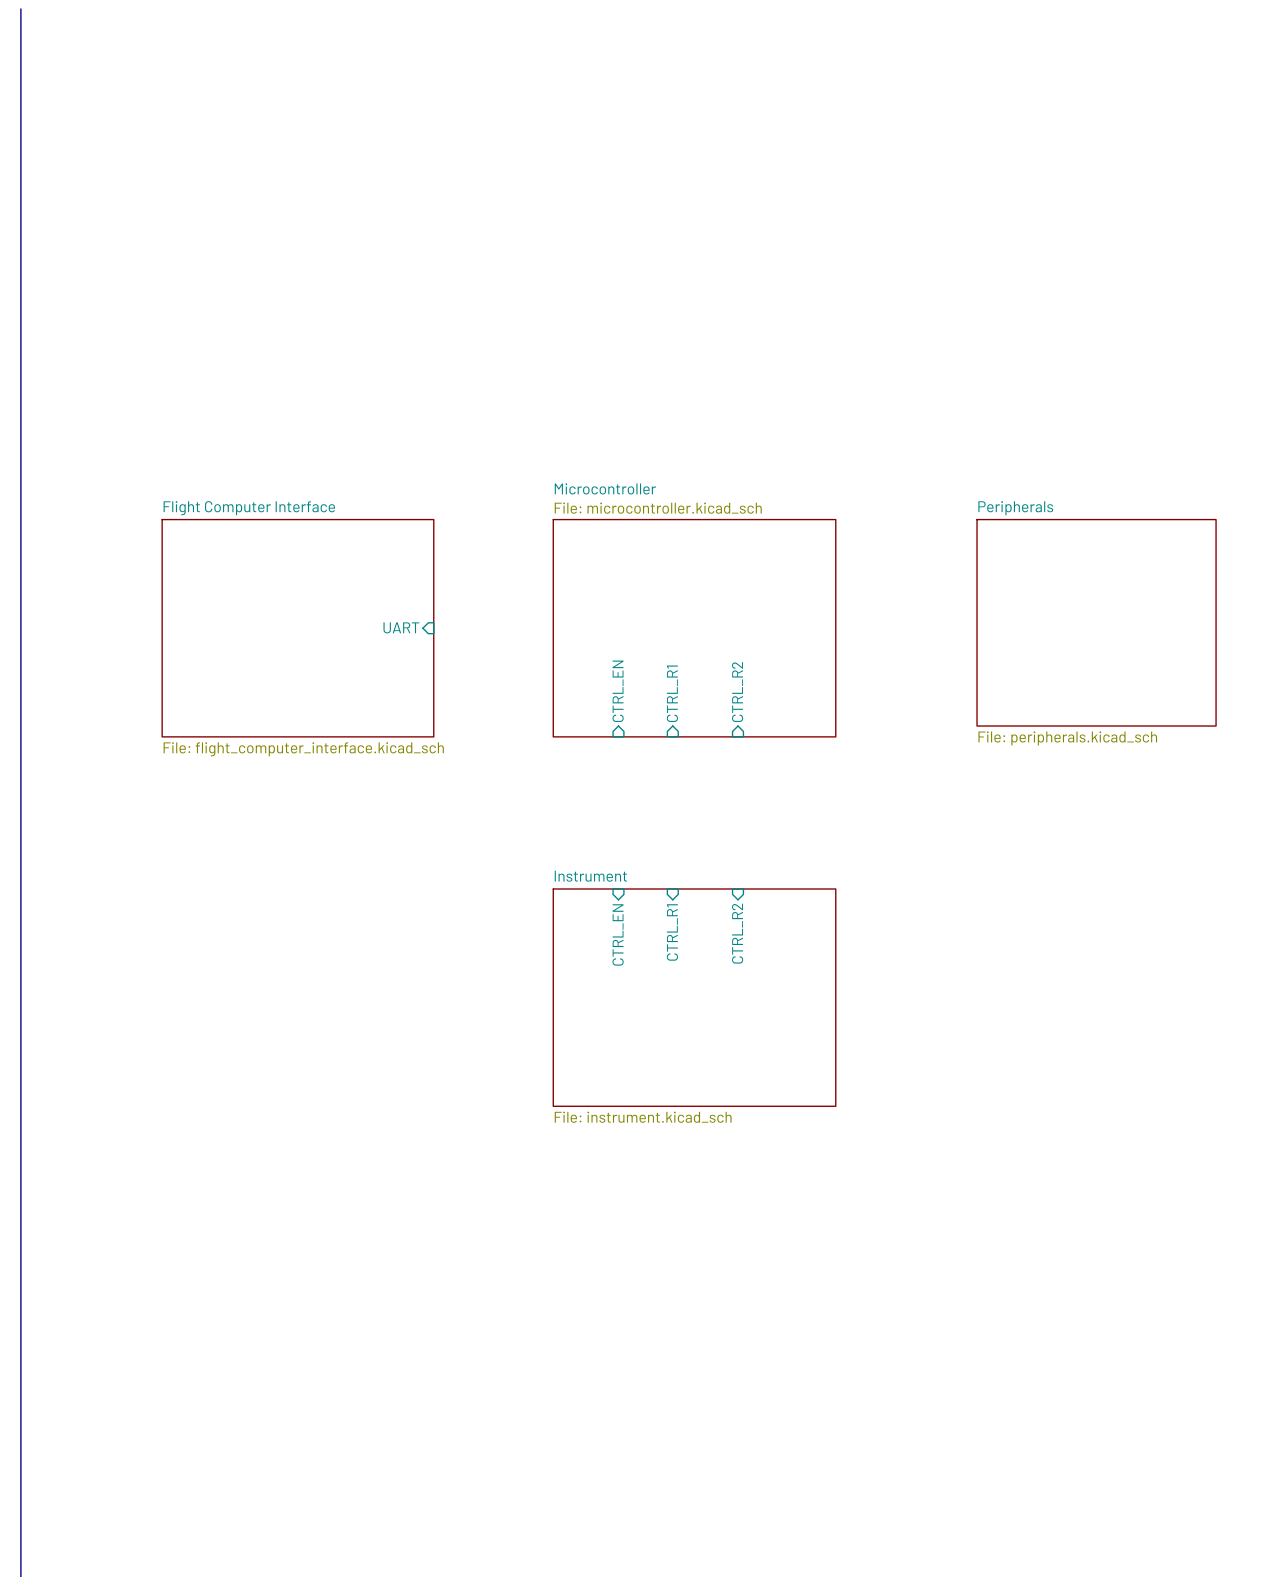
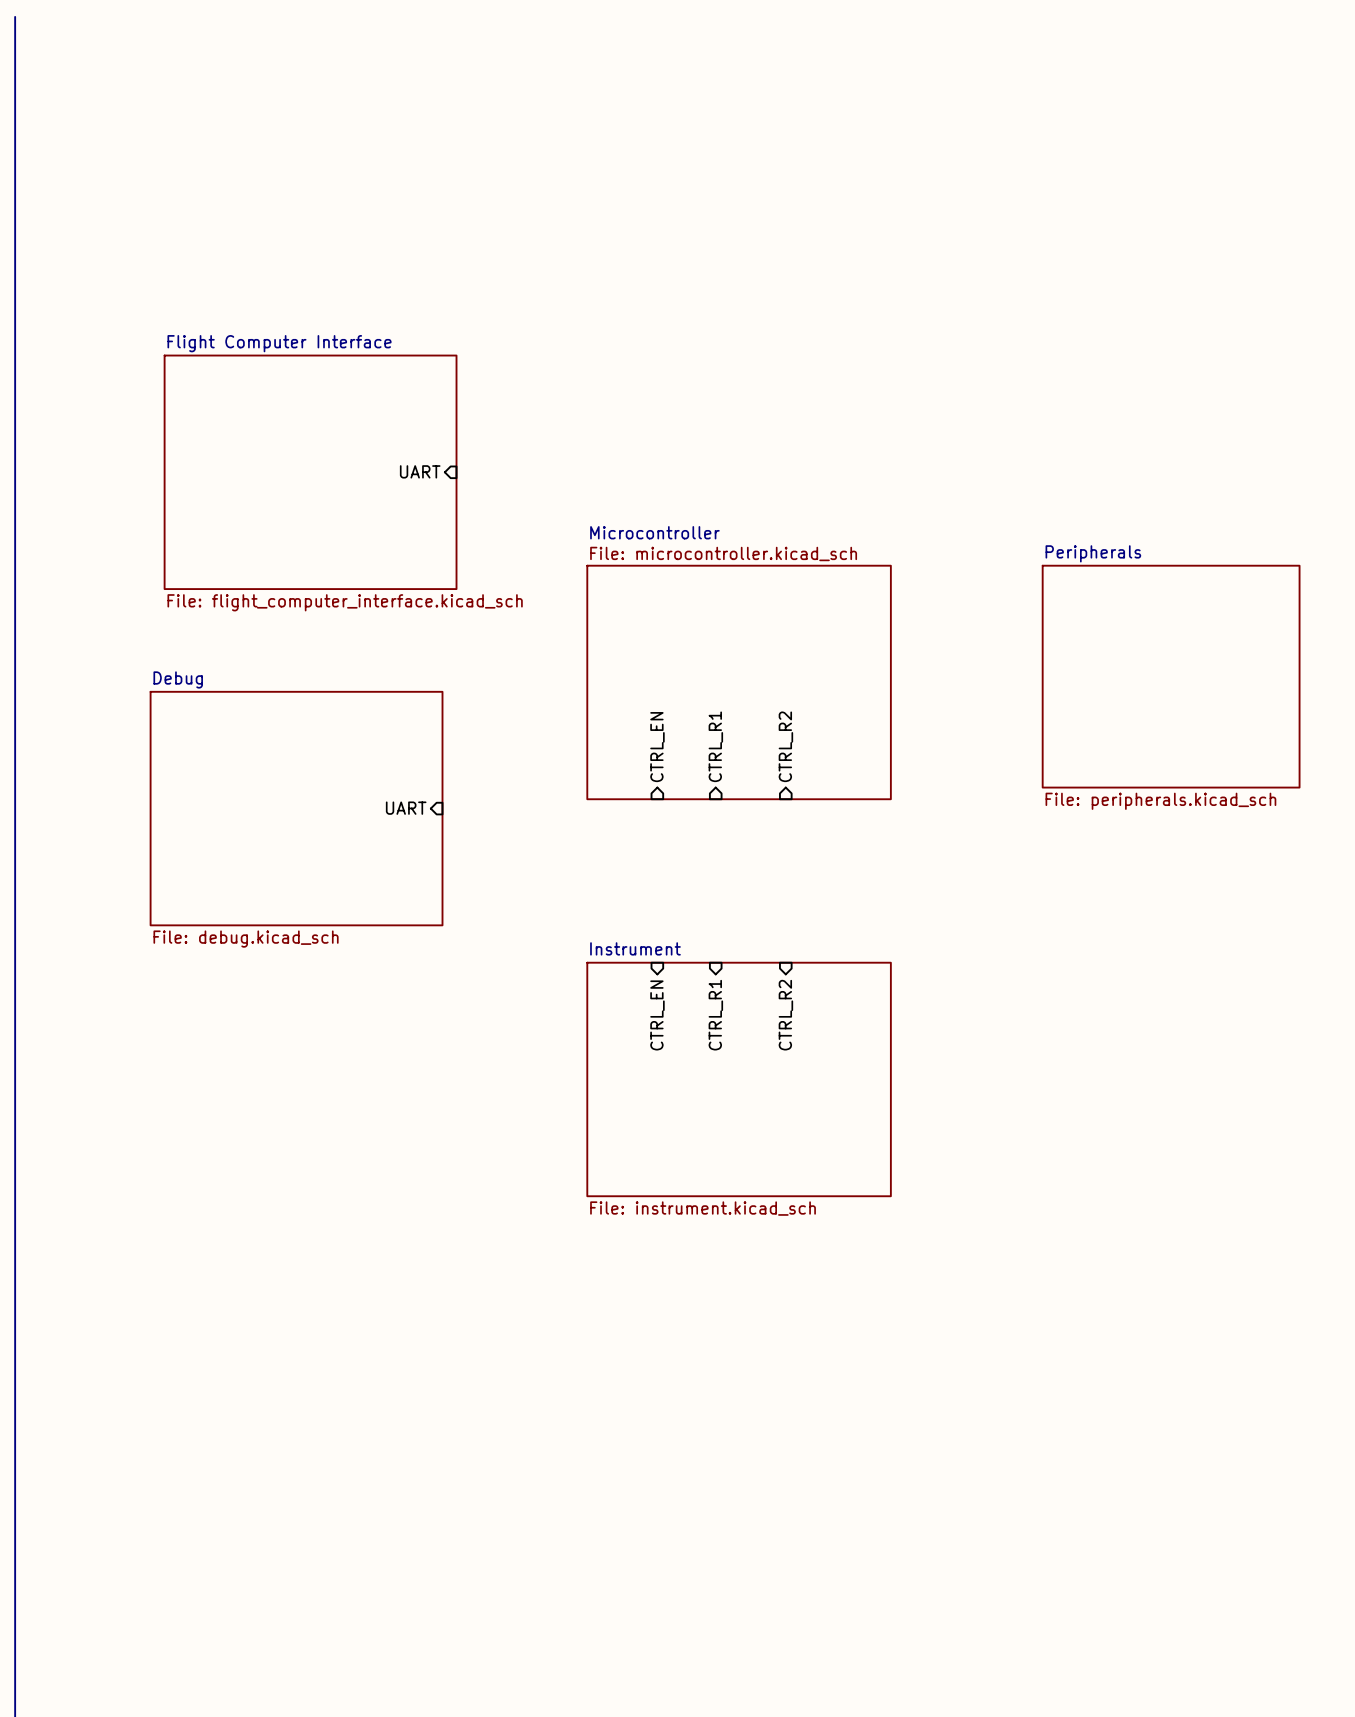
sheet pin: none -> UART (420, 471)
sheet pin: UART (401, 627) -> none
sheet Flight Computer Interface position: (297, 628) -> (310, 472)
sheet Debug: none -> File: debug.kicad_sch (296, 808)
sheet pin: none -> UART (406, 808)

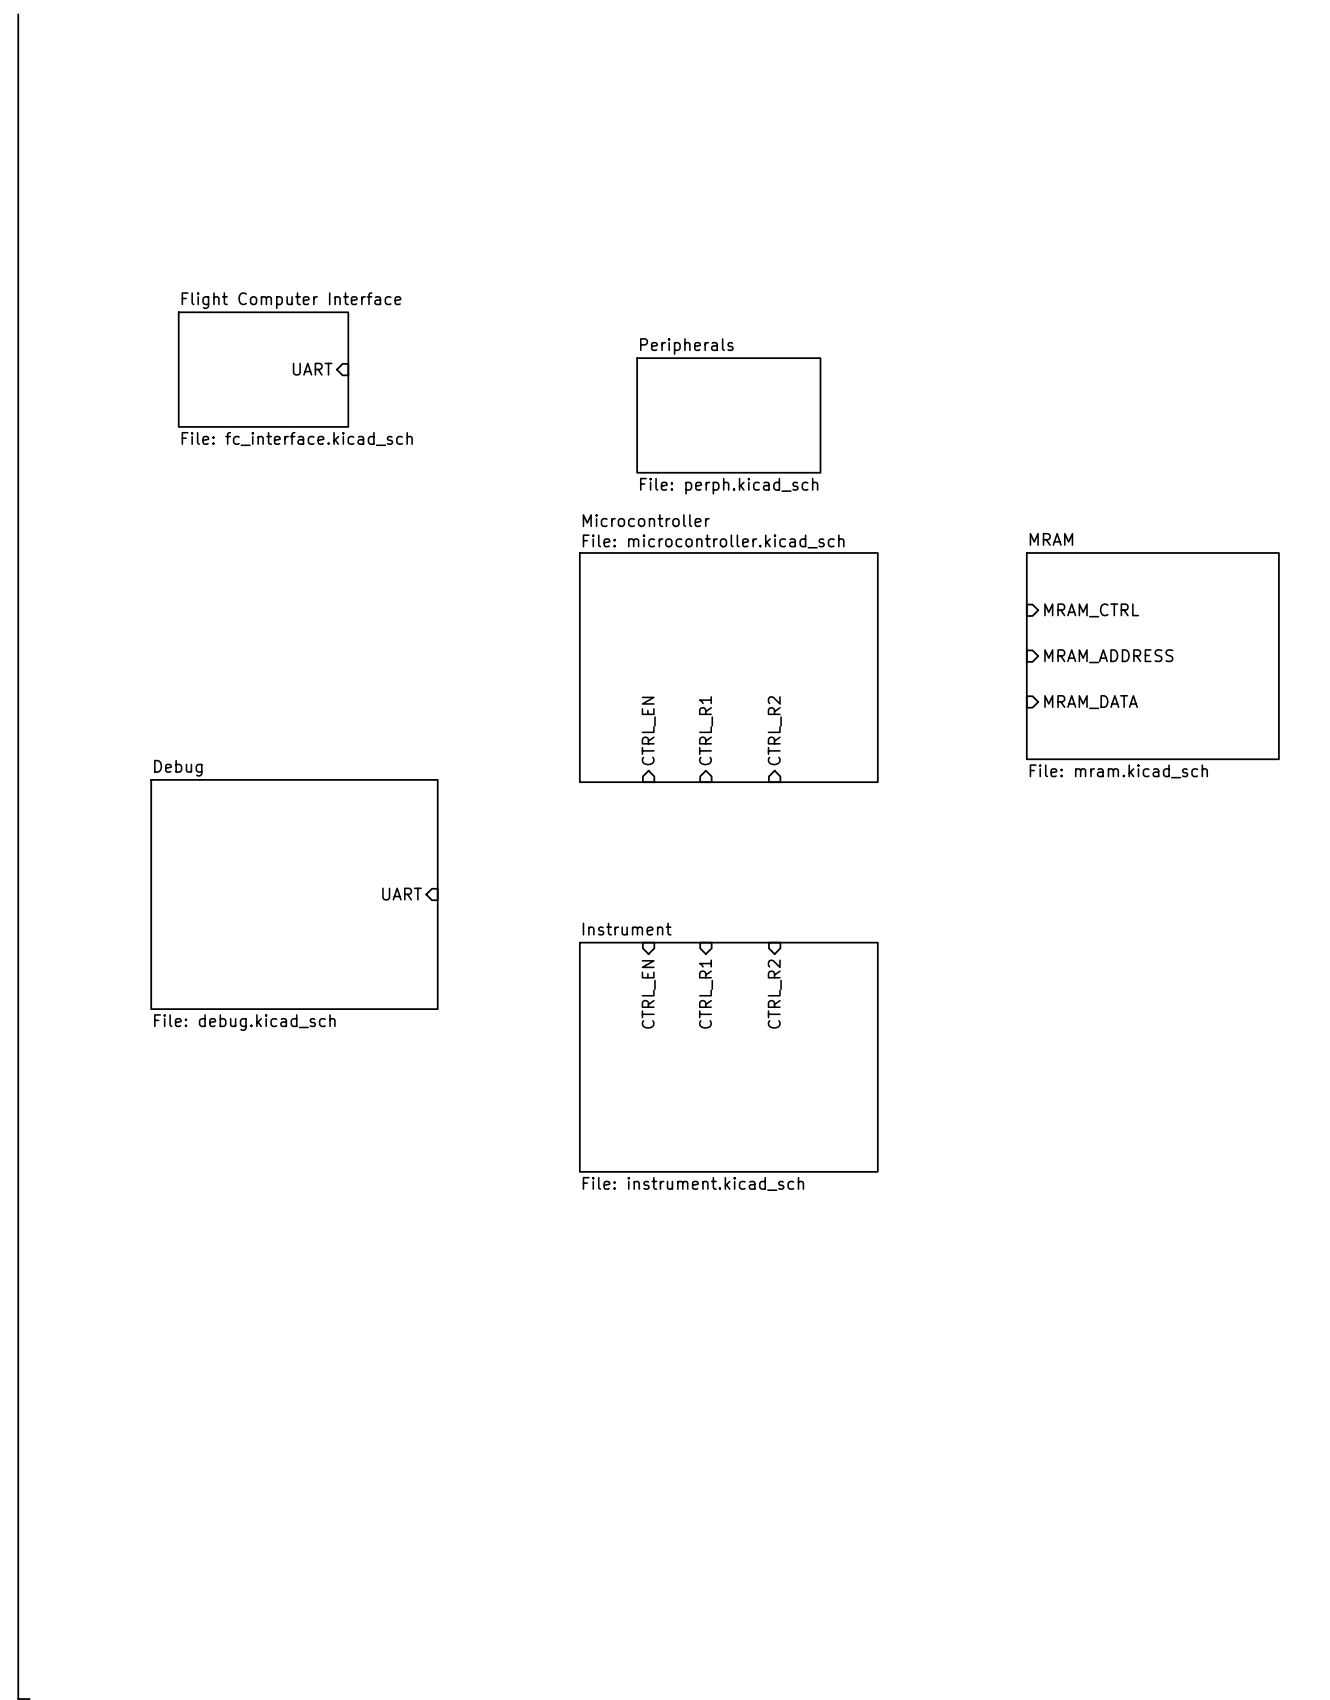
sheet Flight Computer Interface: none -> File: fc_interface.kicad_sch (263, 369)
sheet Peripherals: none -> File: perph.kicad_sch (728, 415)
sheet pin position: UART (420, 471) -> UART (312, 369)
sheet Flight Computer Interface: File: flight_computer_interface.kicad_sch (310, 472) -> none
sheet pin: none -> MRAM_CTRL (1091, 610)
sheet pin: none -> MRAM_ADDRESS (1108, 656)
sheet MRAM: none -> File: mram.kicad_sch (1152, 656)
sheet Peripherals: File: peripherals.kicad_sch (1171, 676) -> none
sheet pin: none -> MRAM_DATA (1091, 702)
sheet Debug position: (296, 808) -> (294, 894)
sheet pin position: UART (406, 808) -> UART (402, 894)

